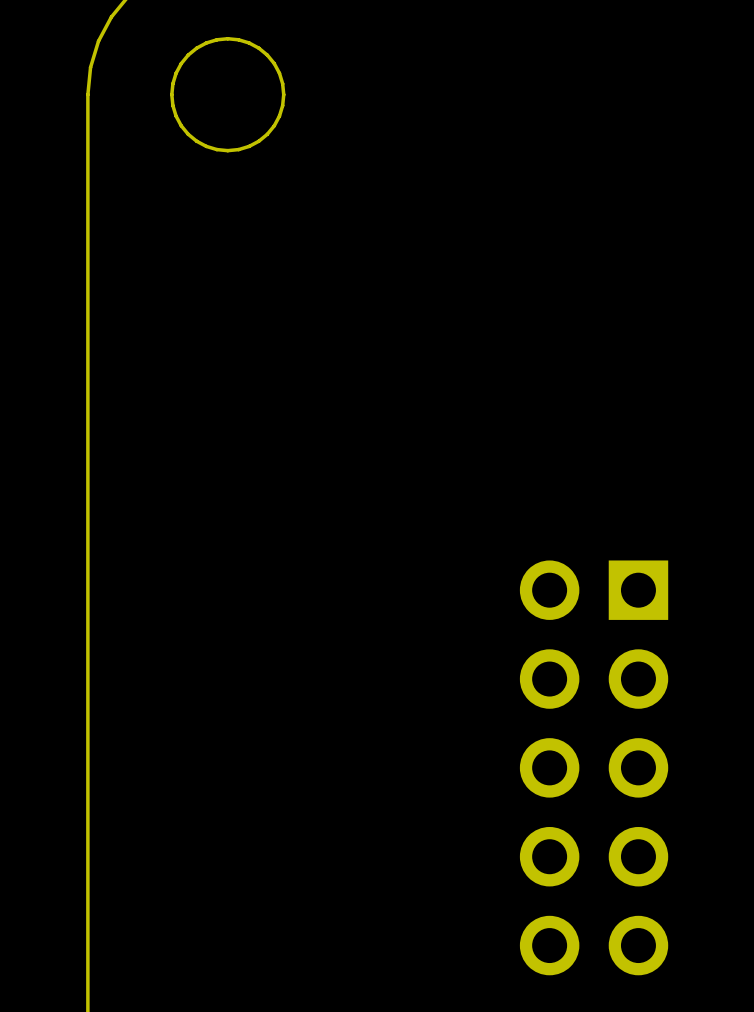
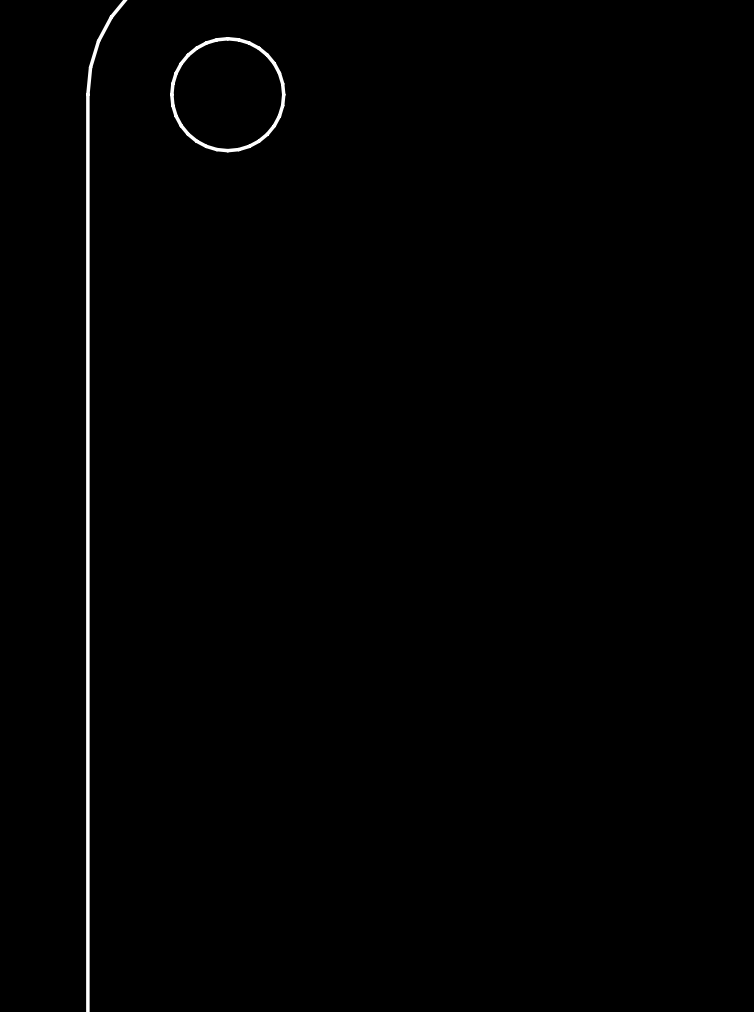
part: (594, 767) -> none

